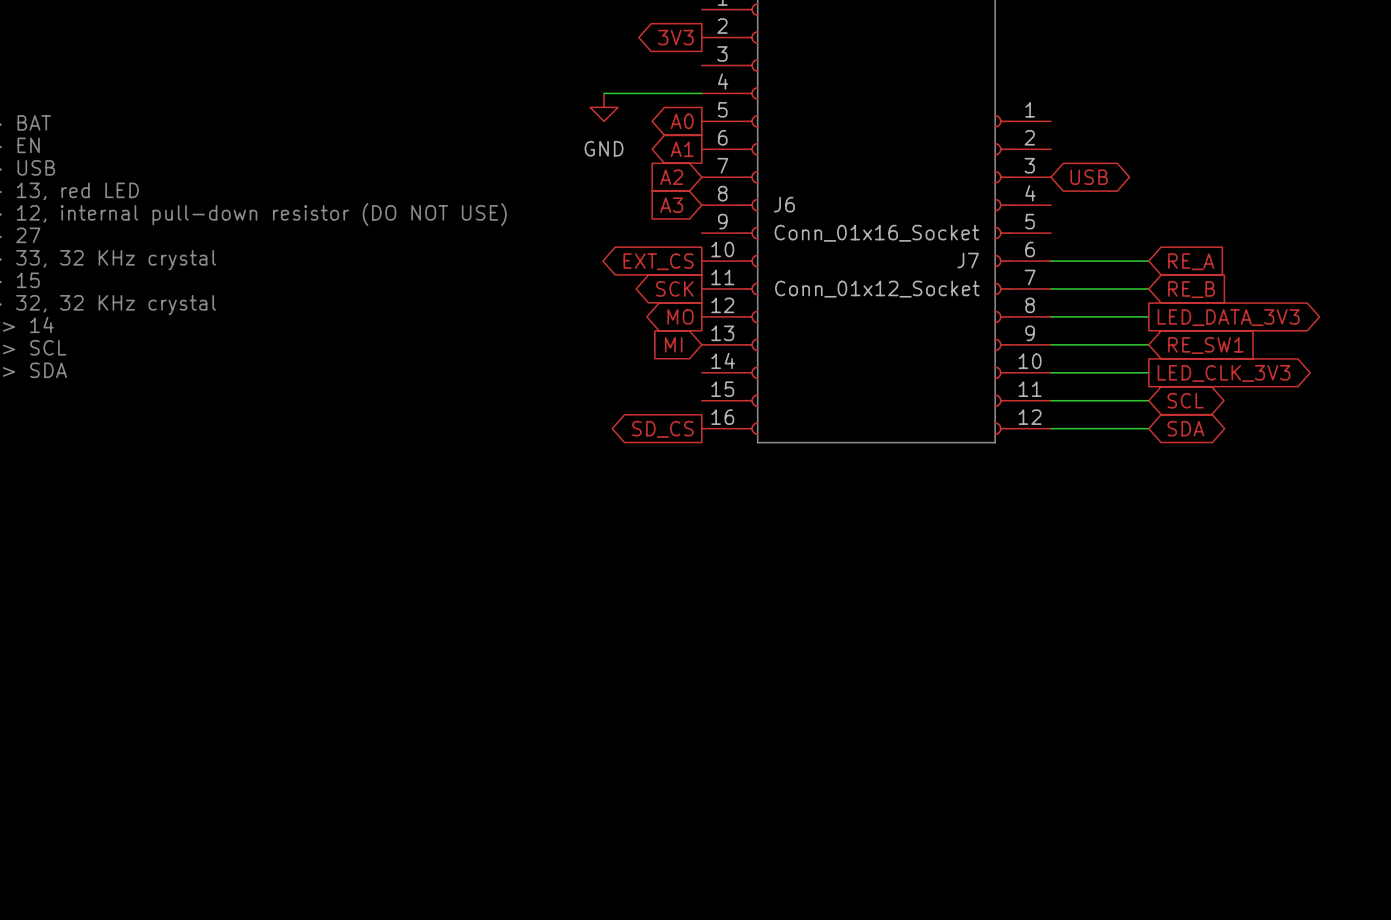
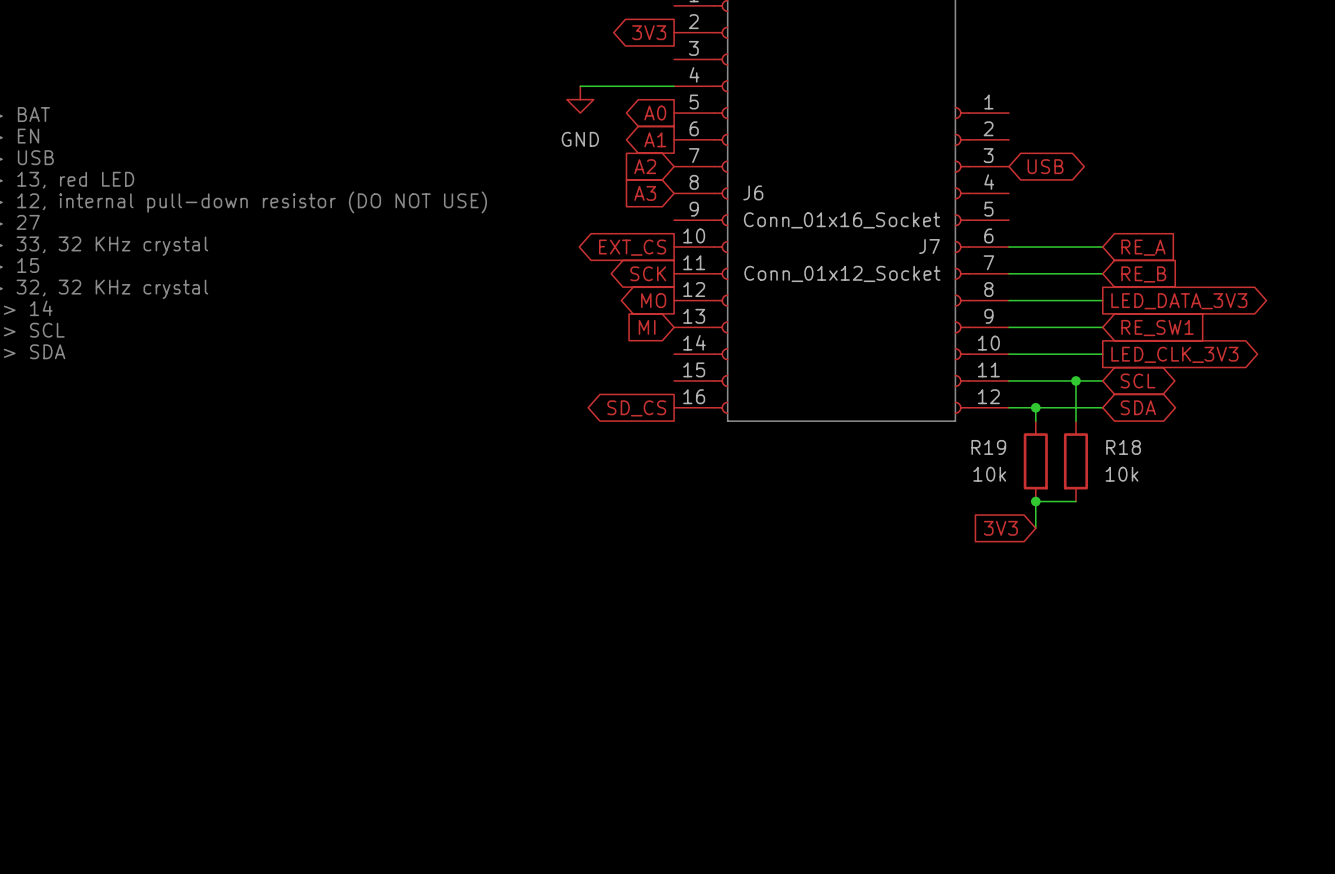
wire: none -> (1075, 380) (1075, 421)
junction: none -> (1075, 380)
wire: none -> (1035, 407) (1035, 421)
junction: none -> (1035, 407)
R19: none -> 10k (1035, 461)
R18: none -> 10k (1075, 461)
junction: none -> (1035, 501)
wire: none -> (1075, 501) (1035, 501) (1035, 528)
global label: none -> 3V3 (1000, 528)

